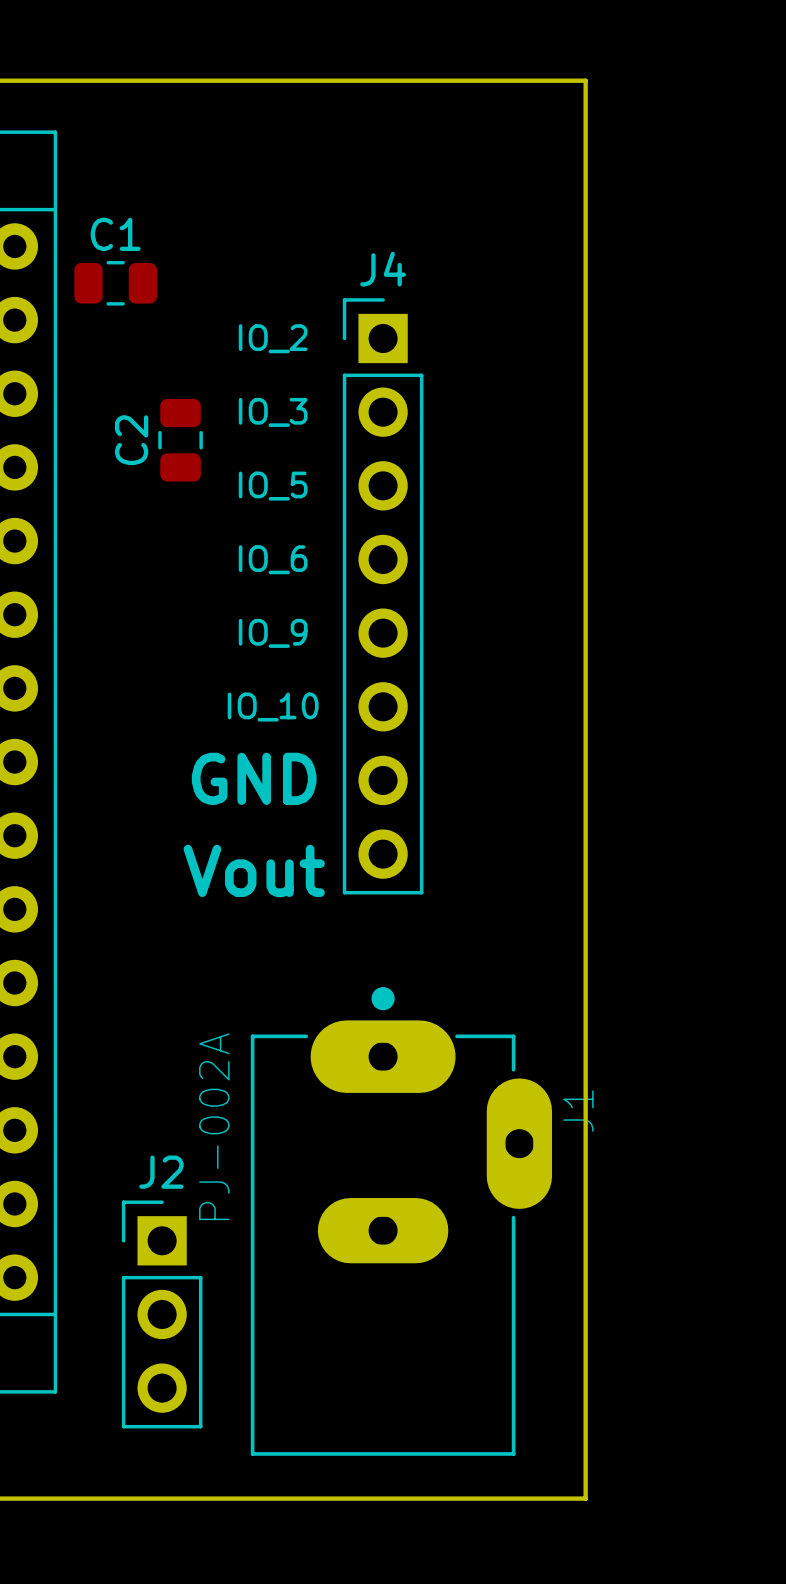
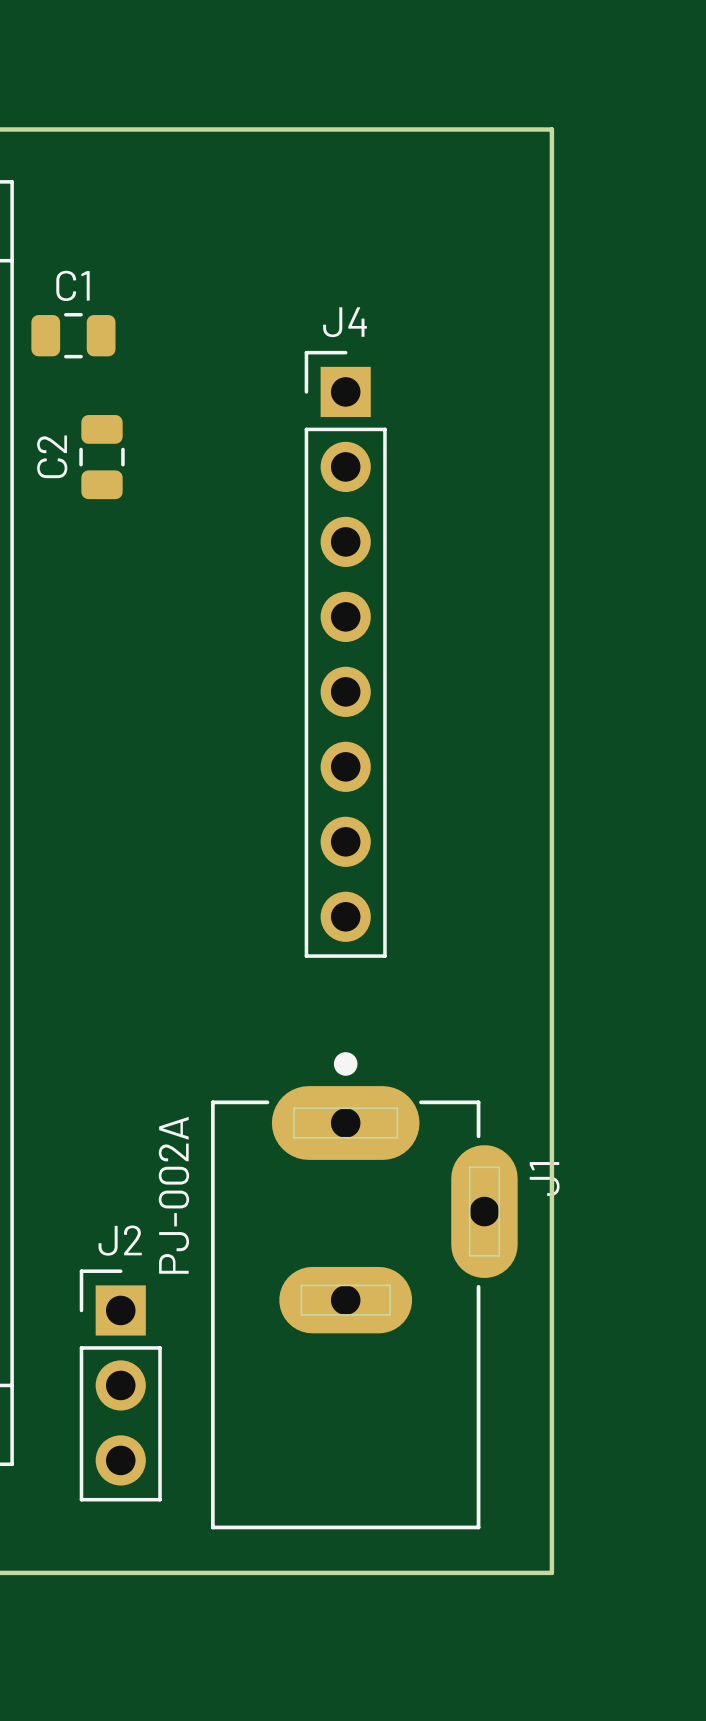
text: IO_2 (273, 338) -> none
text: IO_3 (273, 412) -> none
C2 position: (180, 440) -> (102, 457)
text: IO_5 (273, 486) -> none
text: IO_6 (273, 559) -> none
text: IO_9 (273, 633) -> none
text: IO_10 (273, 707) -> none
text: GND (254, 778) -> none
text: Vout (254, 870) -> none

